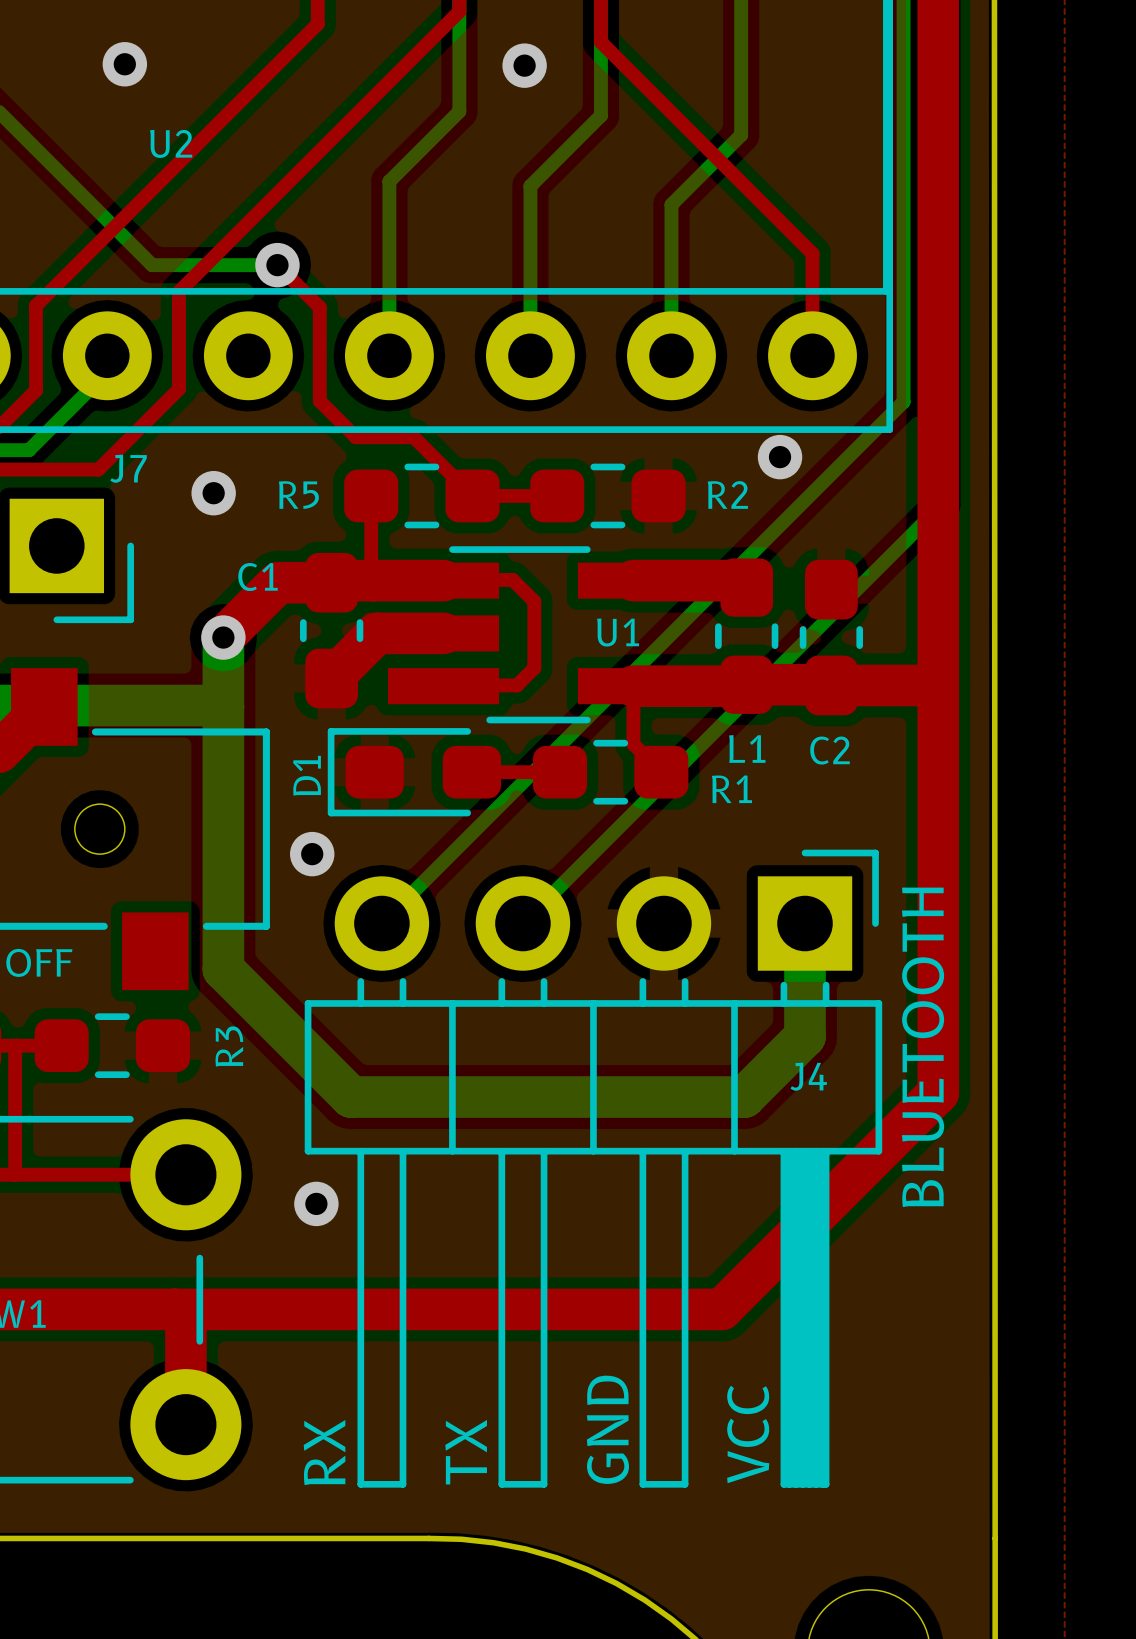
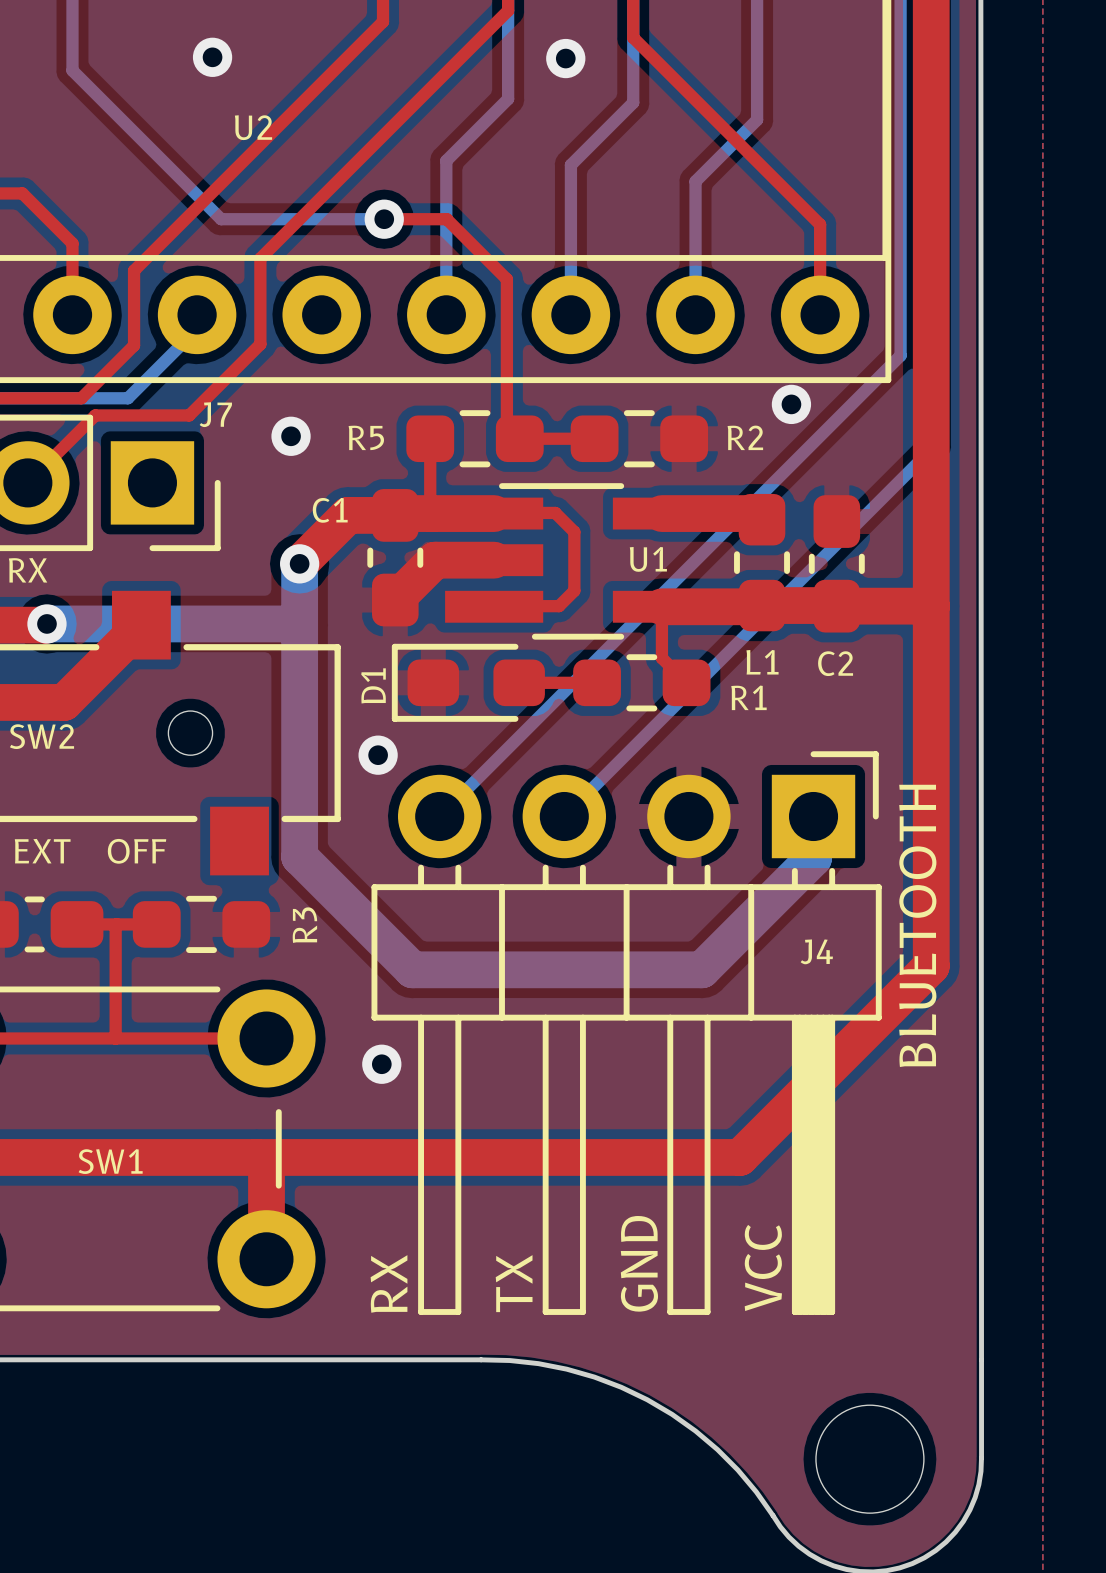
bottom track: (134, 247) (152, 265) (277, 265) -> (221, 219) (384, 219)
top track: (277, 265) (319, 307) (319, 401) (355, 437) (413, 437) (457, 481) -> (384, 219) (446, 219) (506, 279) (506, 425)
via position: (277, 265) -> (384, 219)
bottom track: (805, 970) (805, 1036) (744, 1097) (678, 1097) -> (813, 858) (701, 969)

